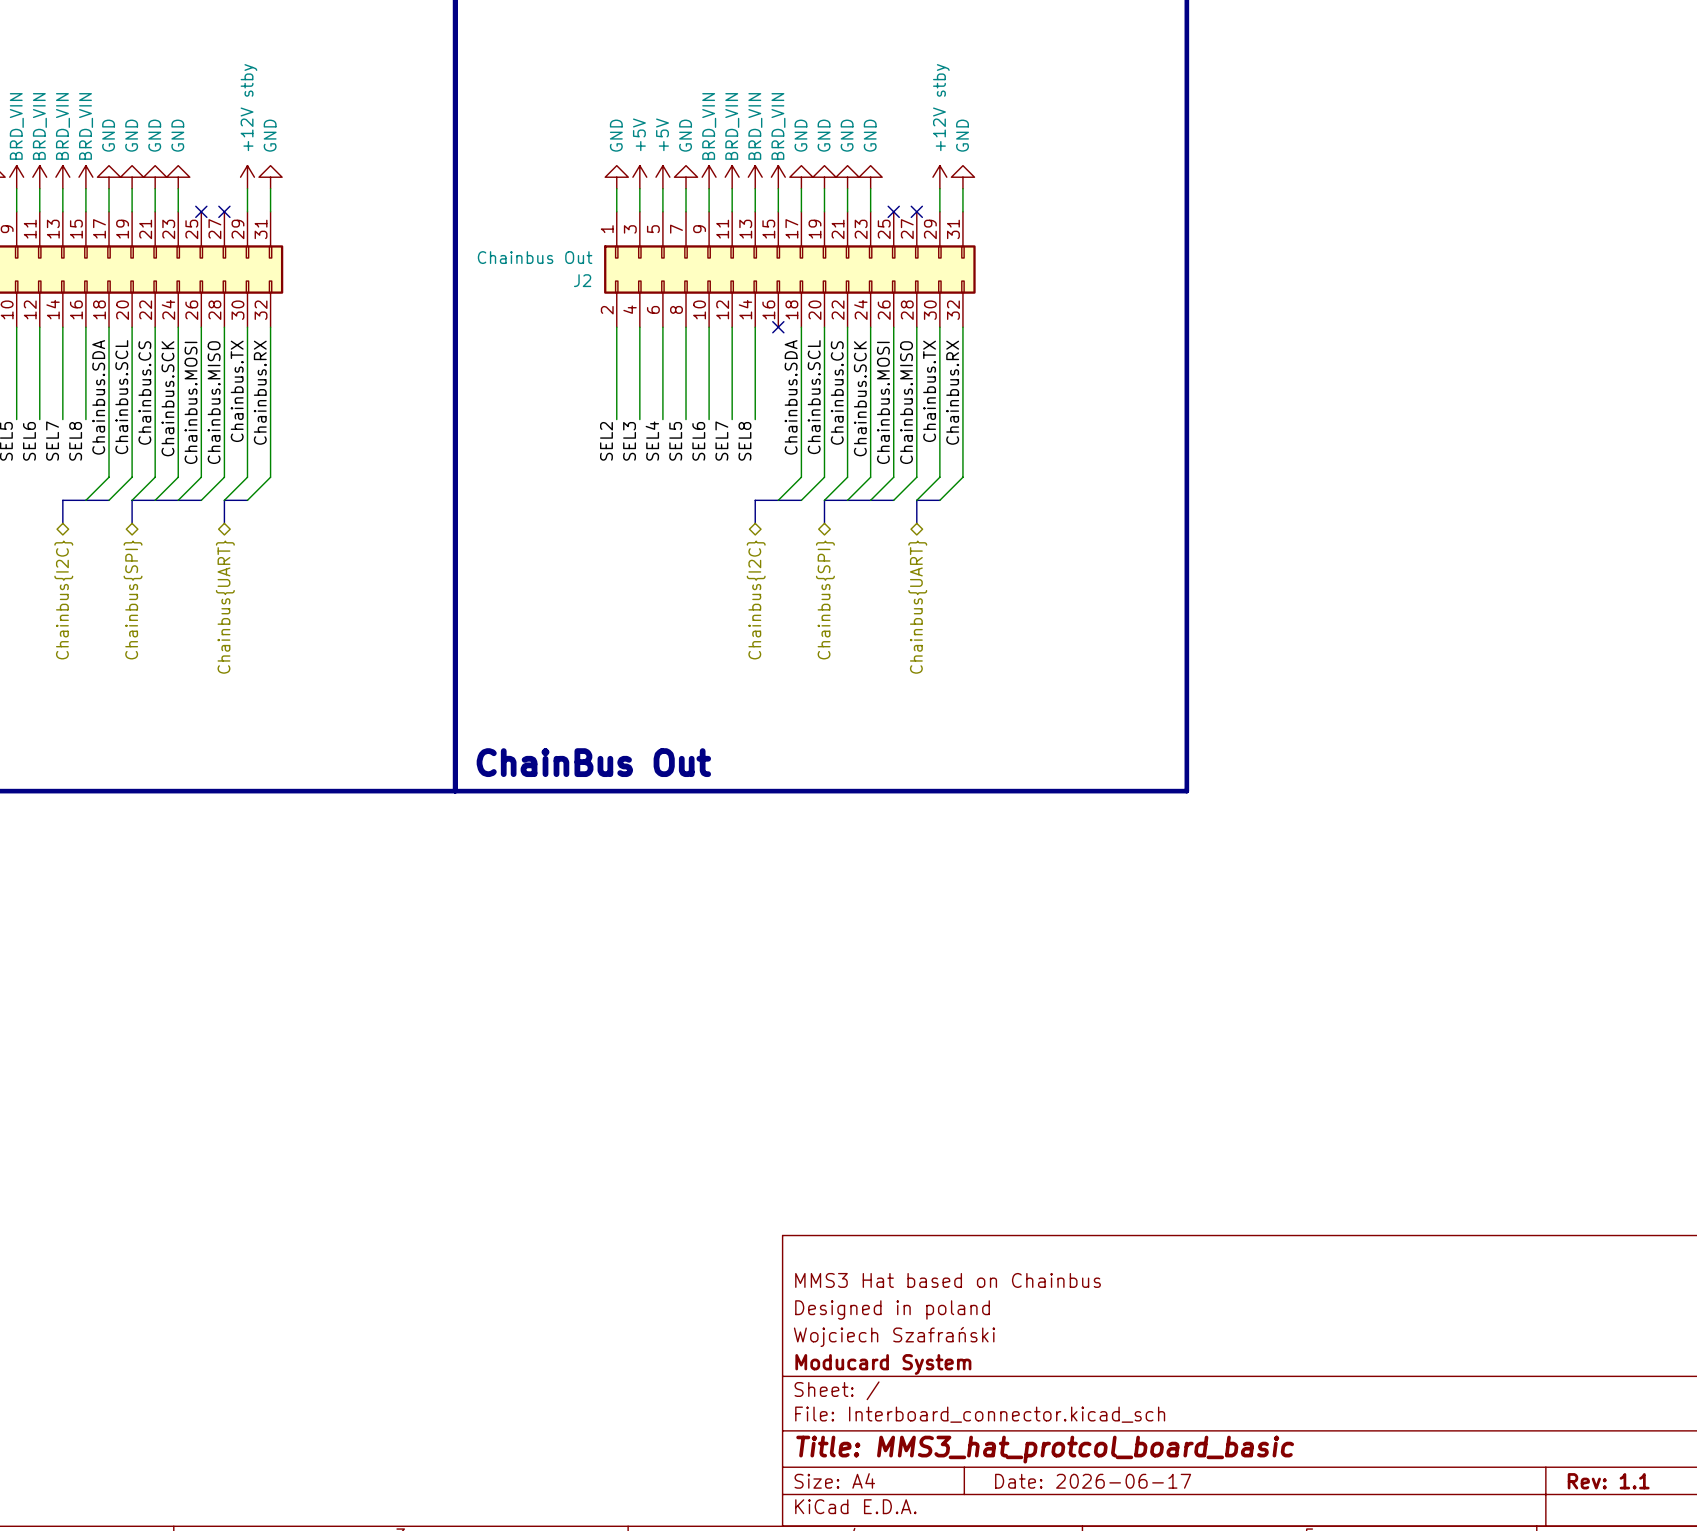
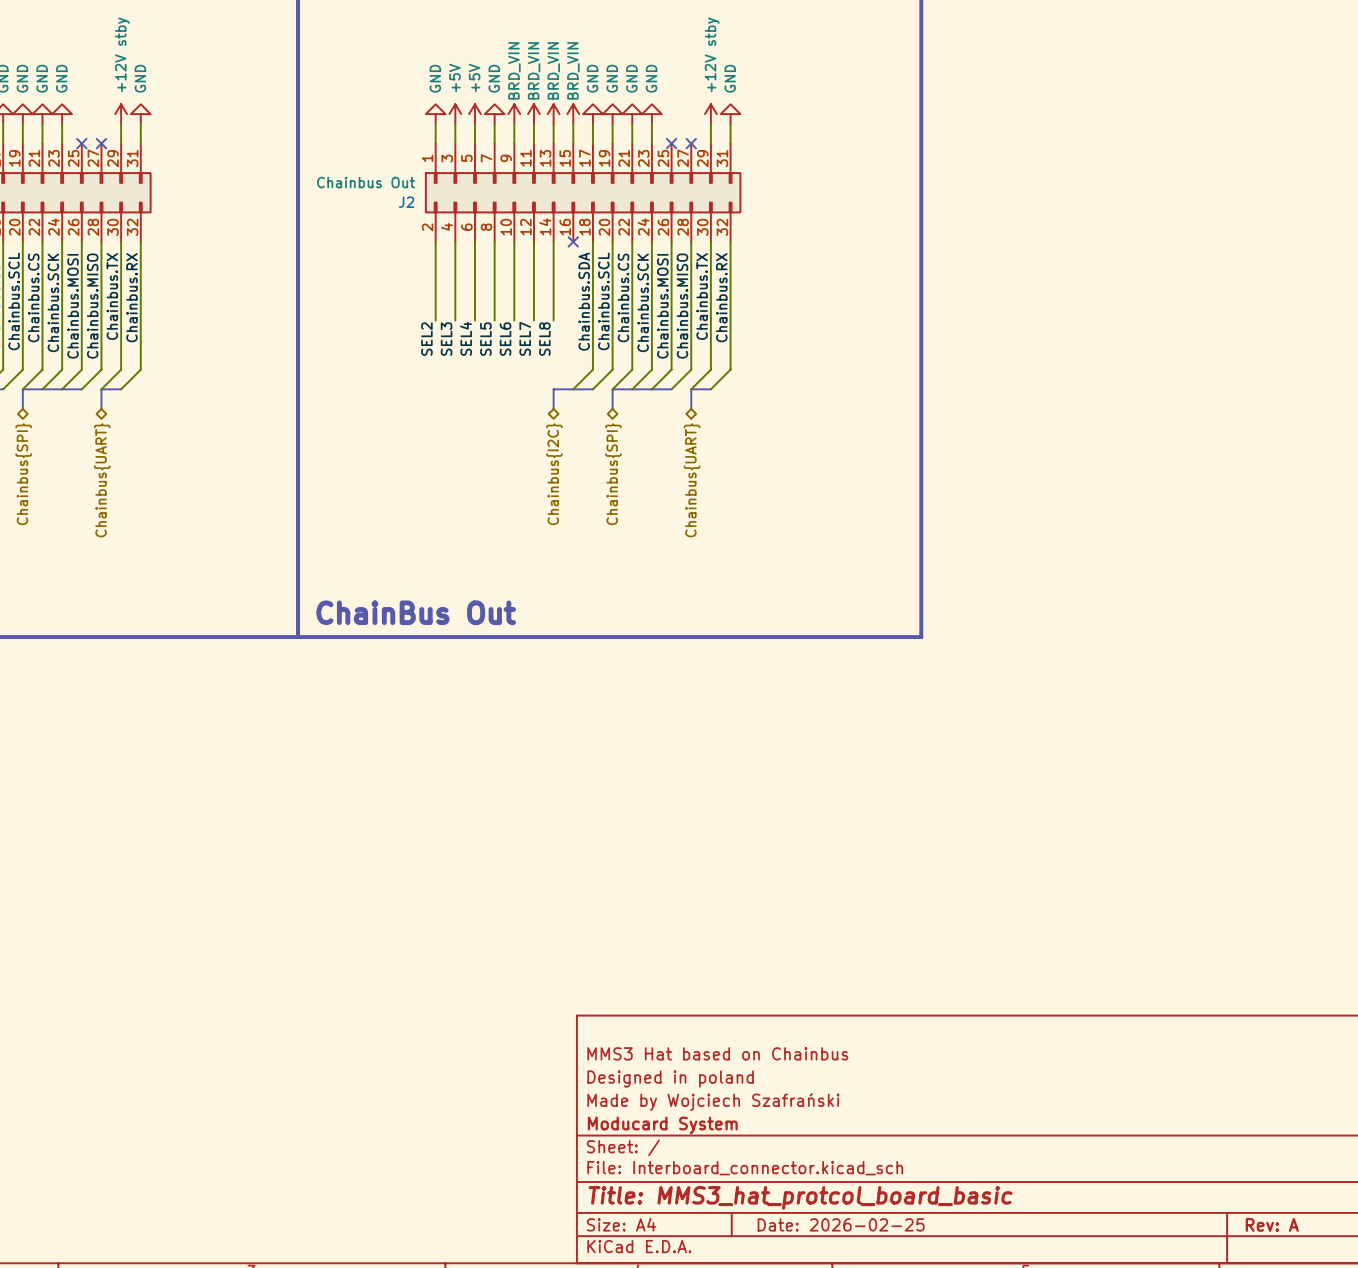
title block: Wojciech Szafrański (894, 1336) -> Made by Wojciech Szafrański (713, 1101)
title block: Date: 2026-06-17 (1093, 1481) -> Date: 2026-02-25 (841, 1224)
title block: Rev: 1.1 (1608, 1481) -> Rev: A (1272, 1224)

